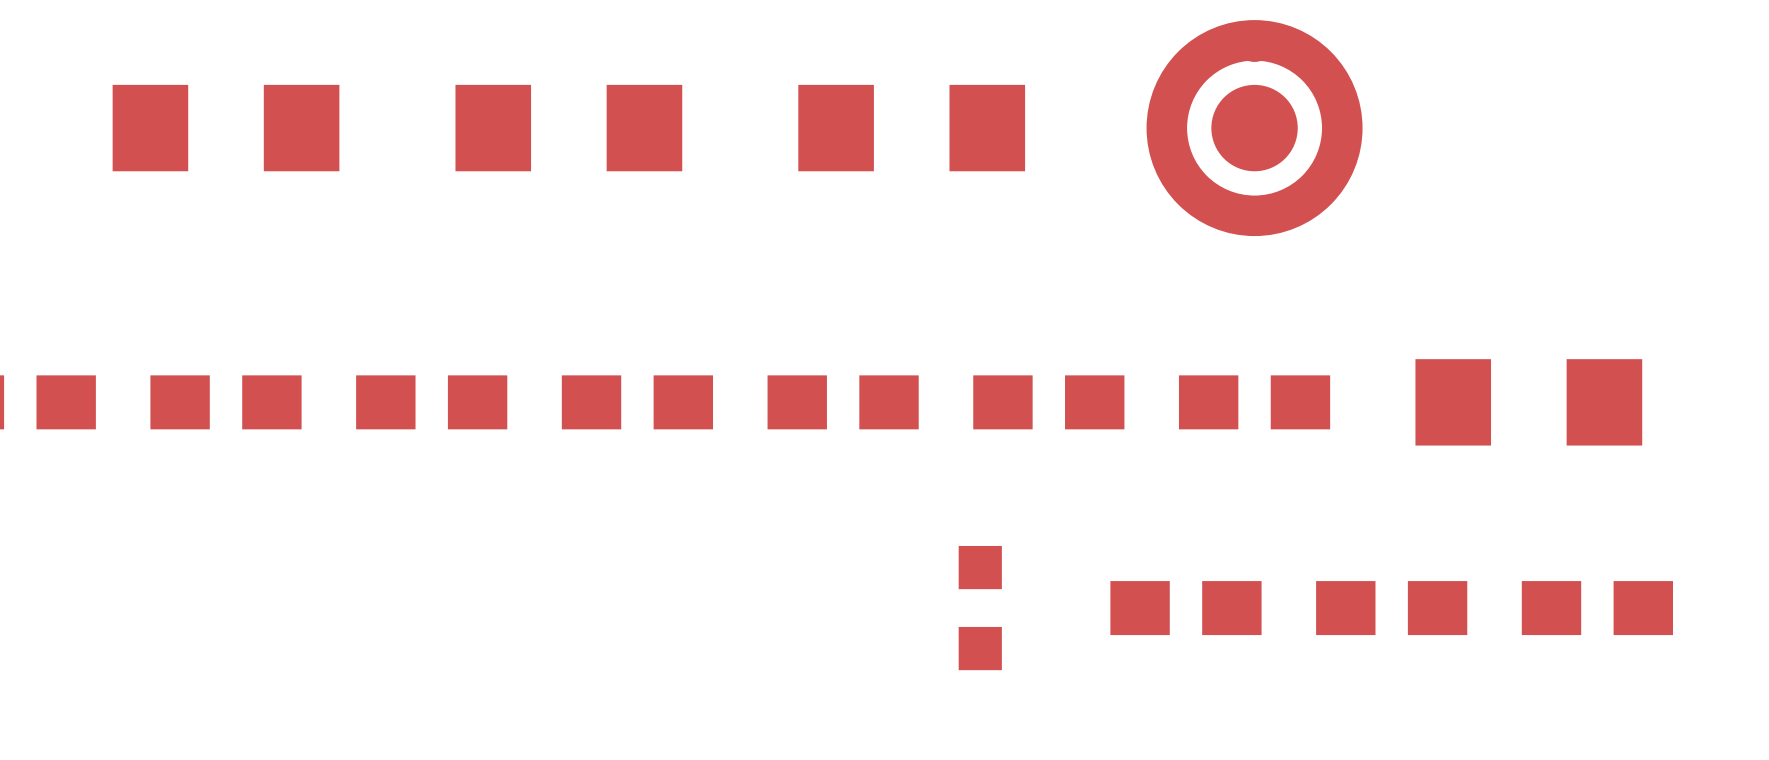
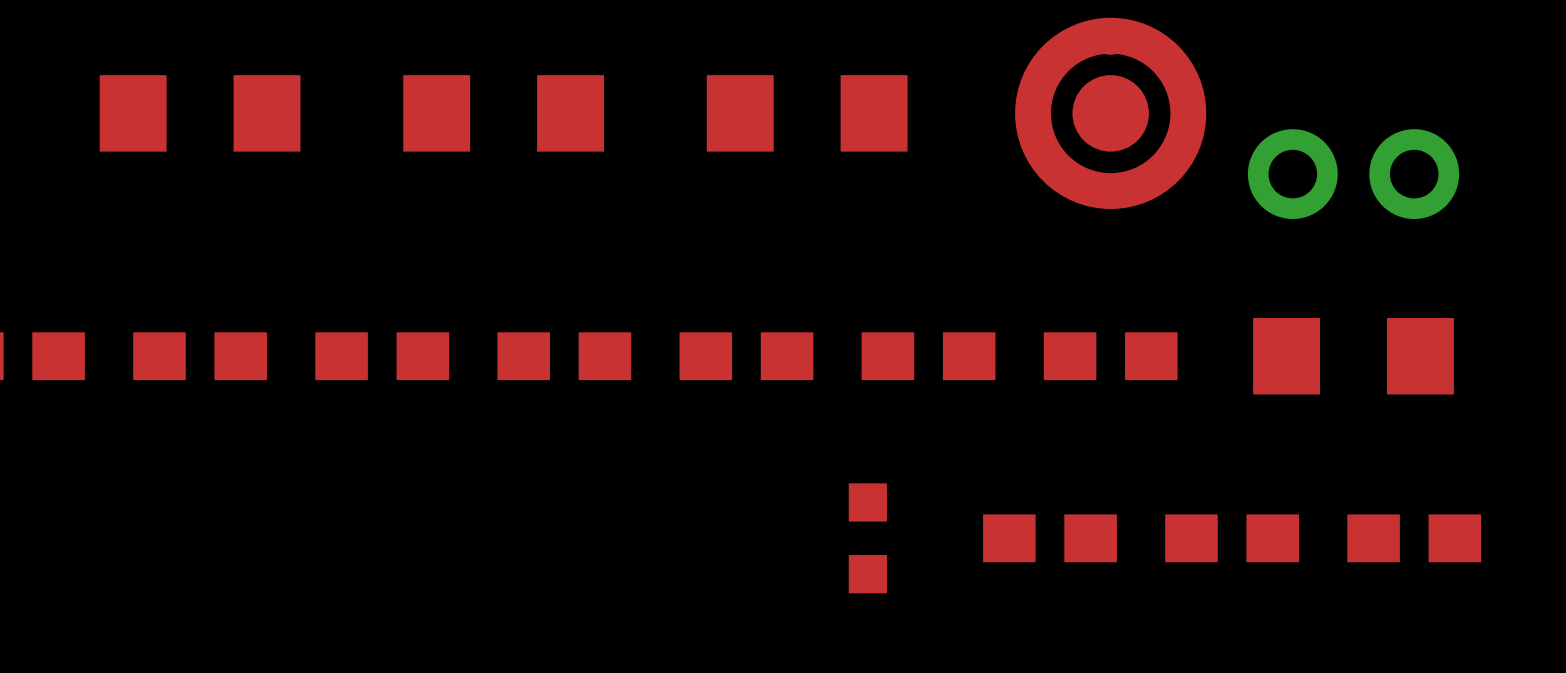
part: none -> (1353, 174)

